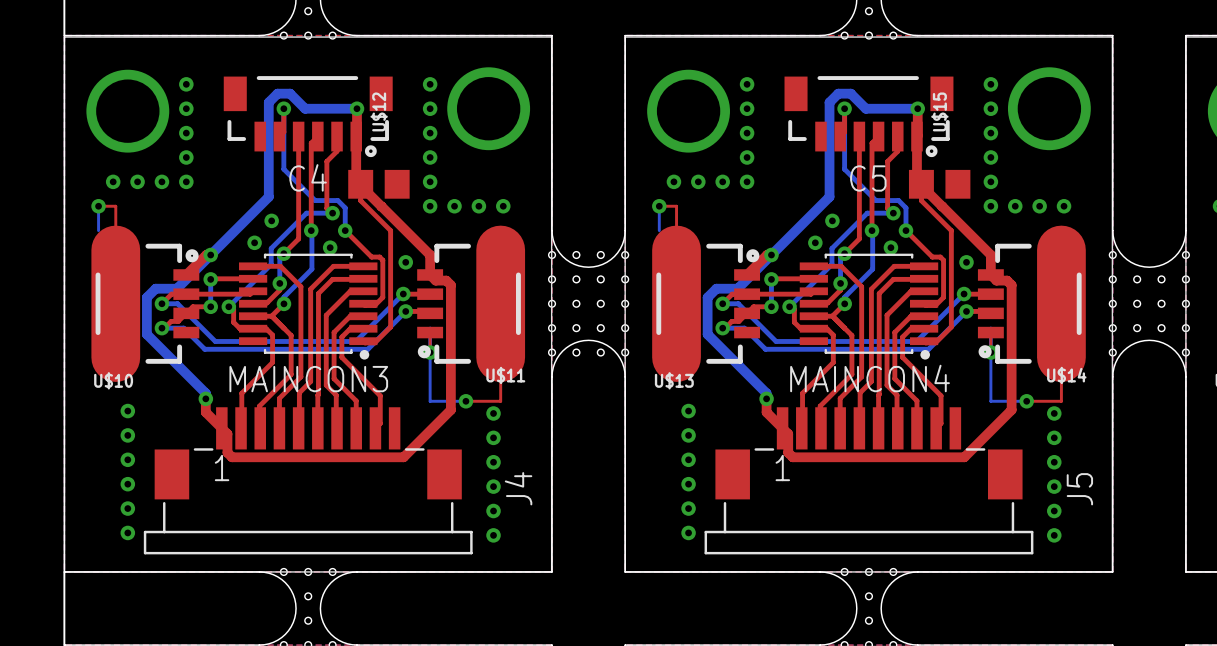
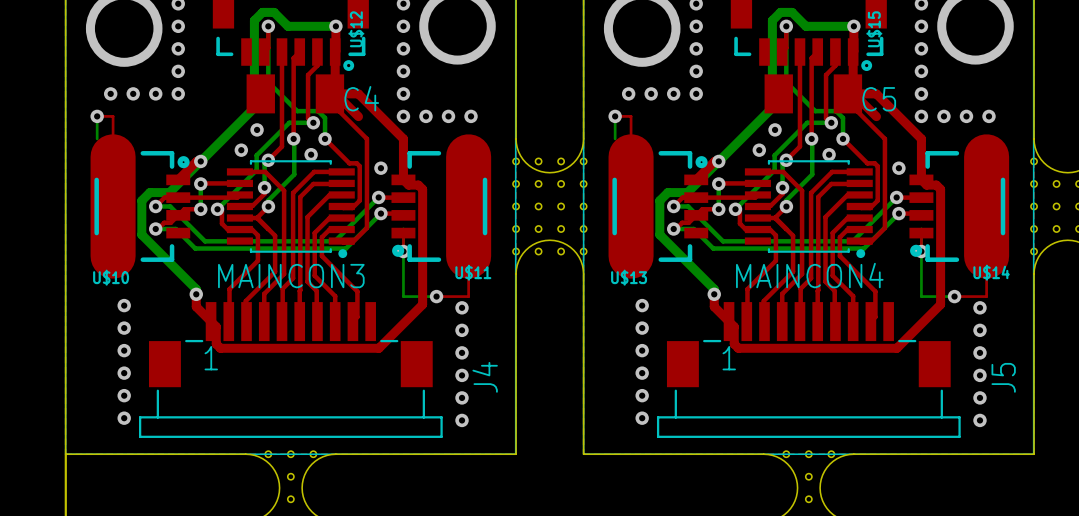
C4 footprint: [348, 169, 410, 199] -> [246, 74, 345, 114]
C5 footprint: [908, 169, 971, 199] -> [764, 74, 863, 114]
C4 name position: C4 (308, 177) -> C4 (361, 98)
C5 name position: C5 (868, 178) -> C5 (879, 99)
top track: (381, 206) (430, 255) -> (329, 93) (358, 93) (403, 138) (403, 161)
top track: (942, 206) (990, 255) -> (847, 93) (876, 93) (921, 138) (921, 161)

